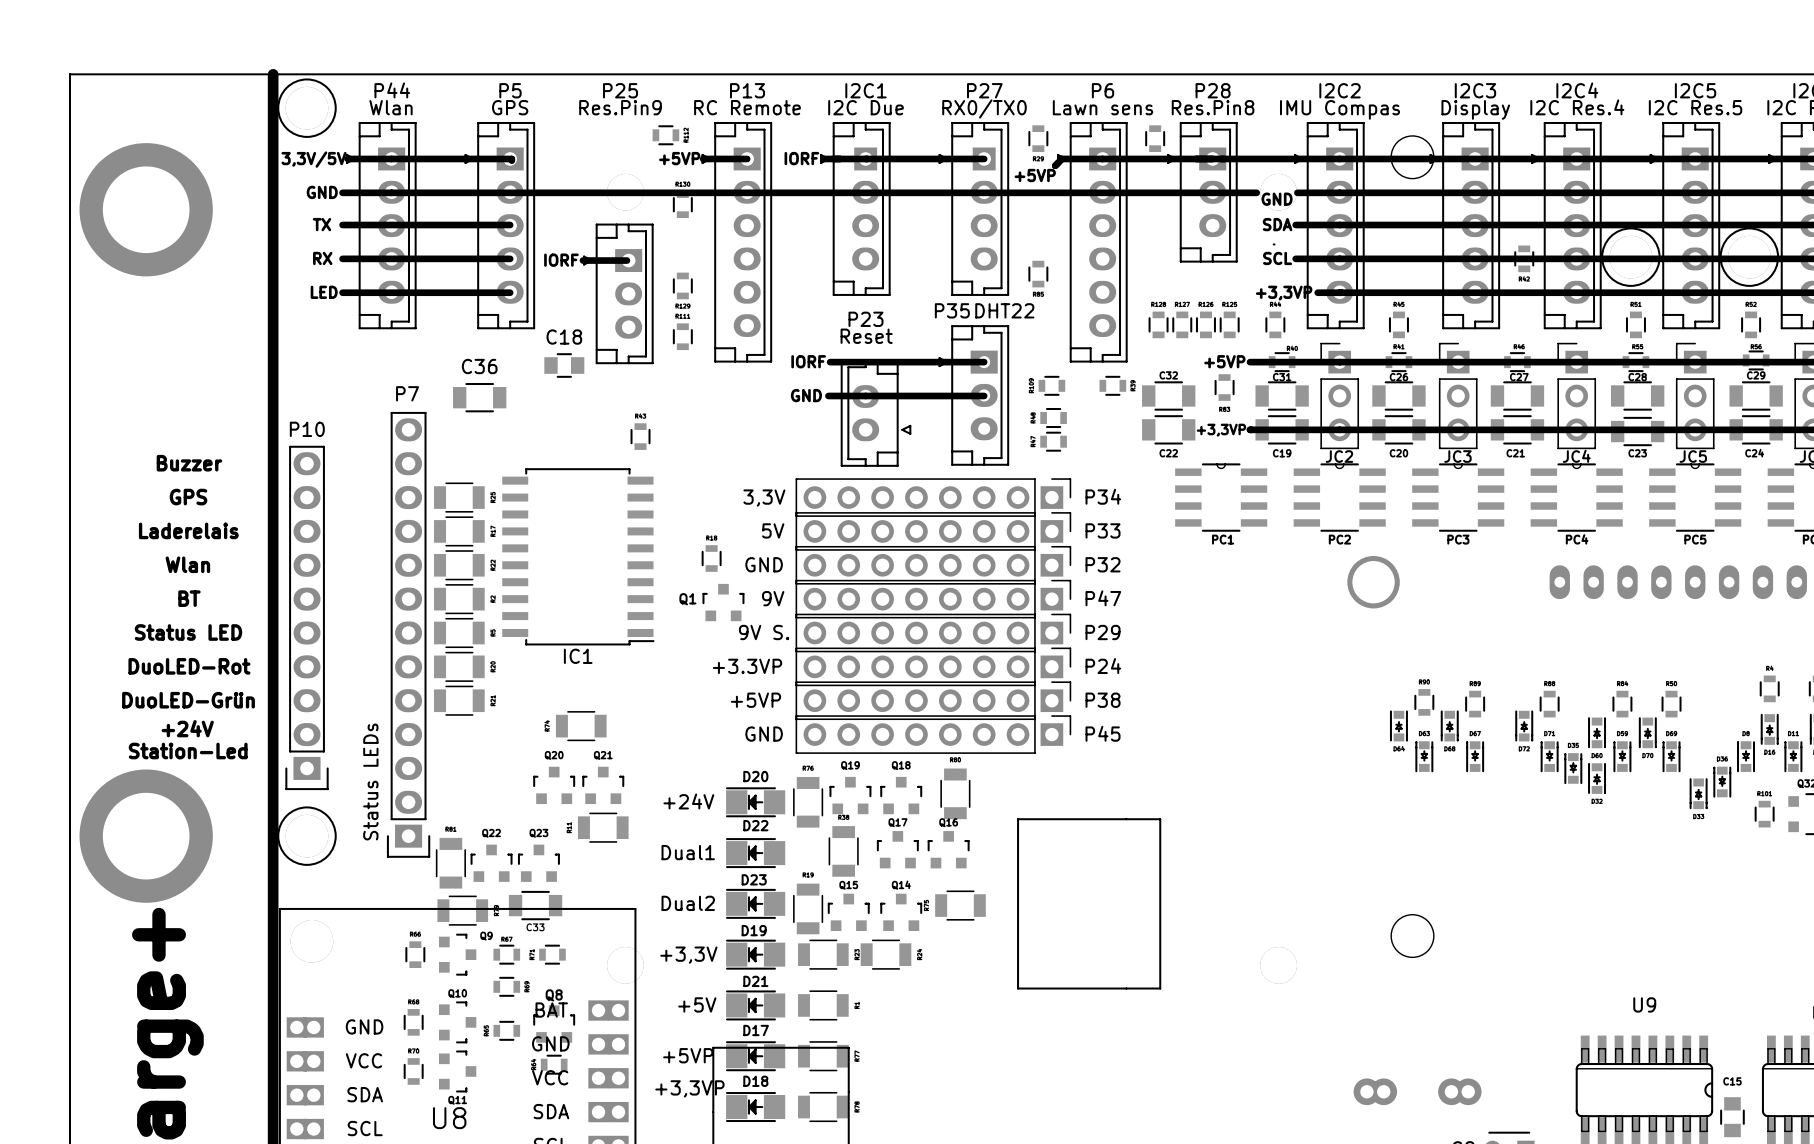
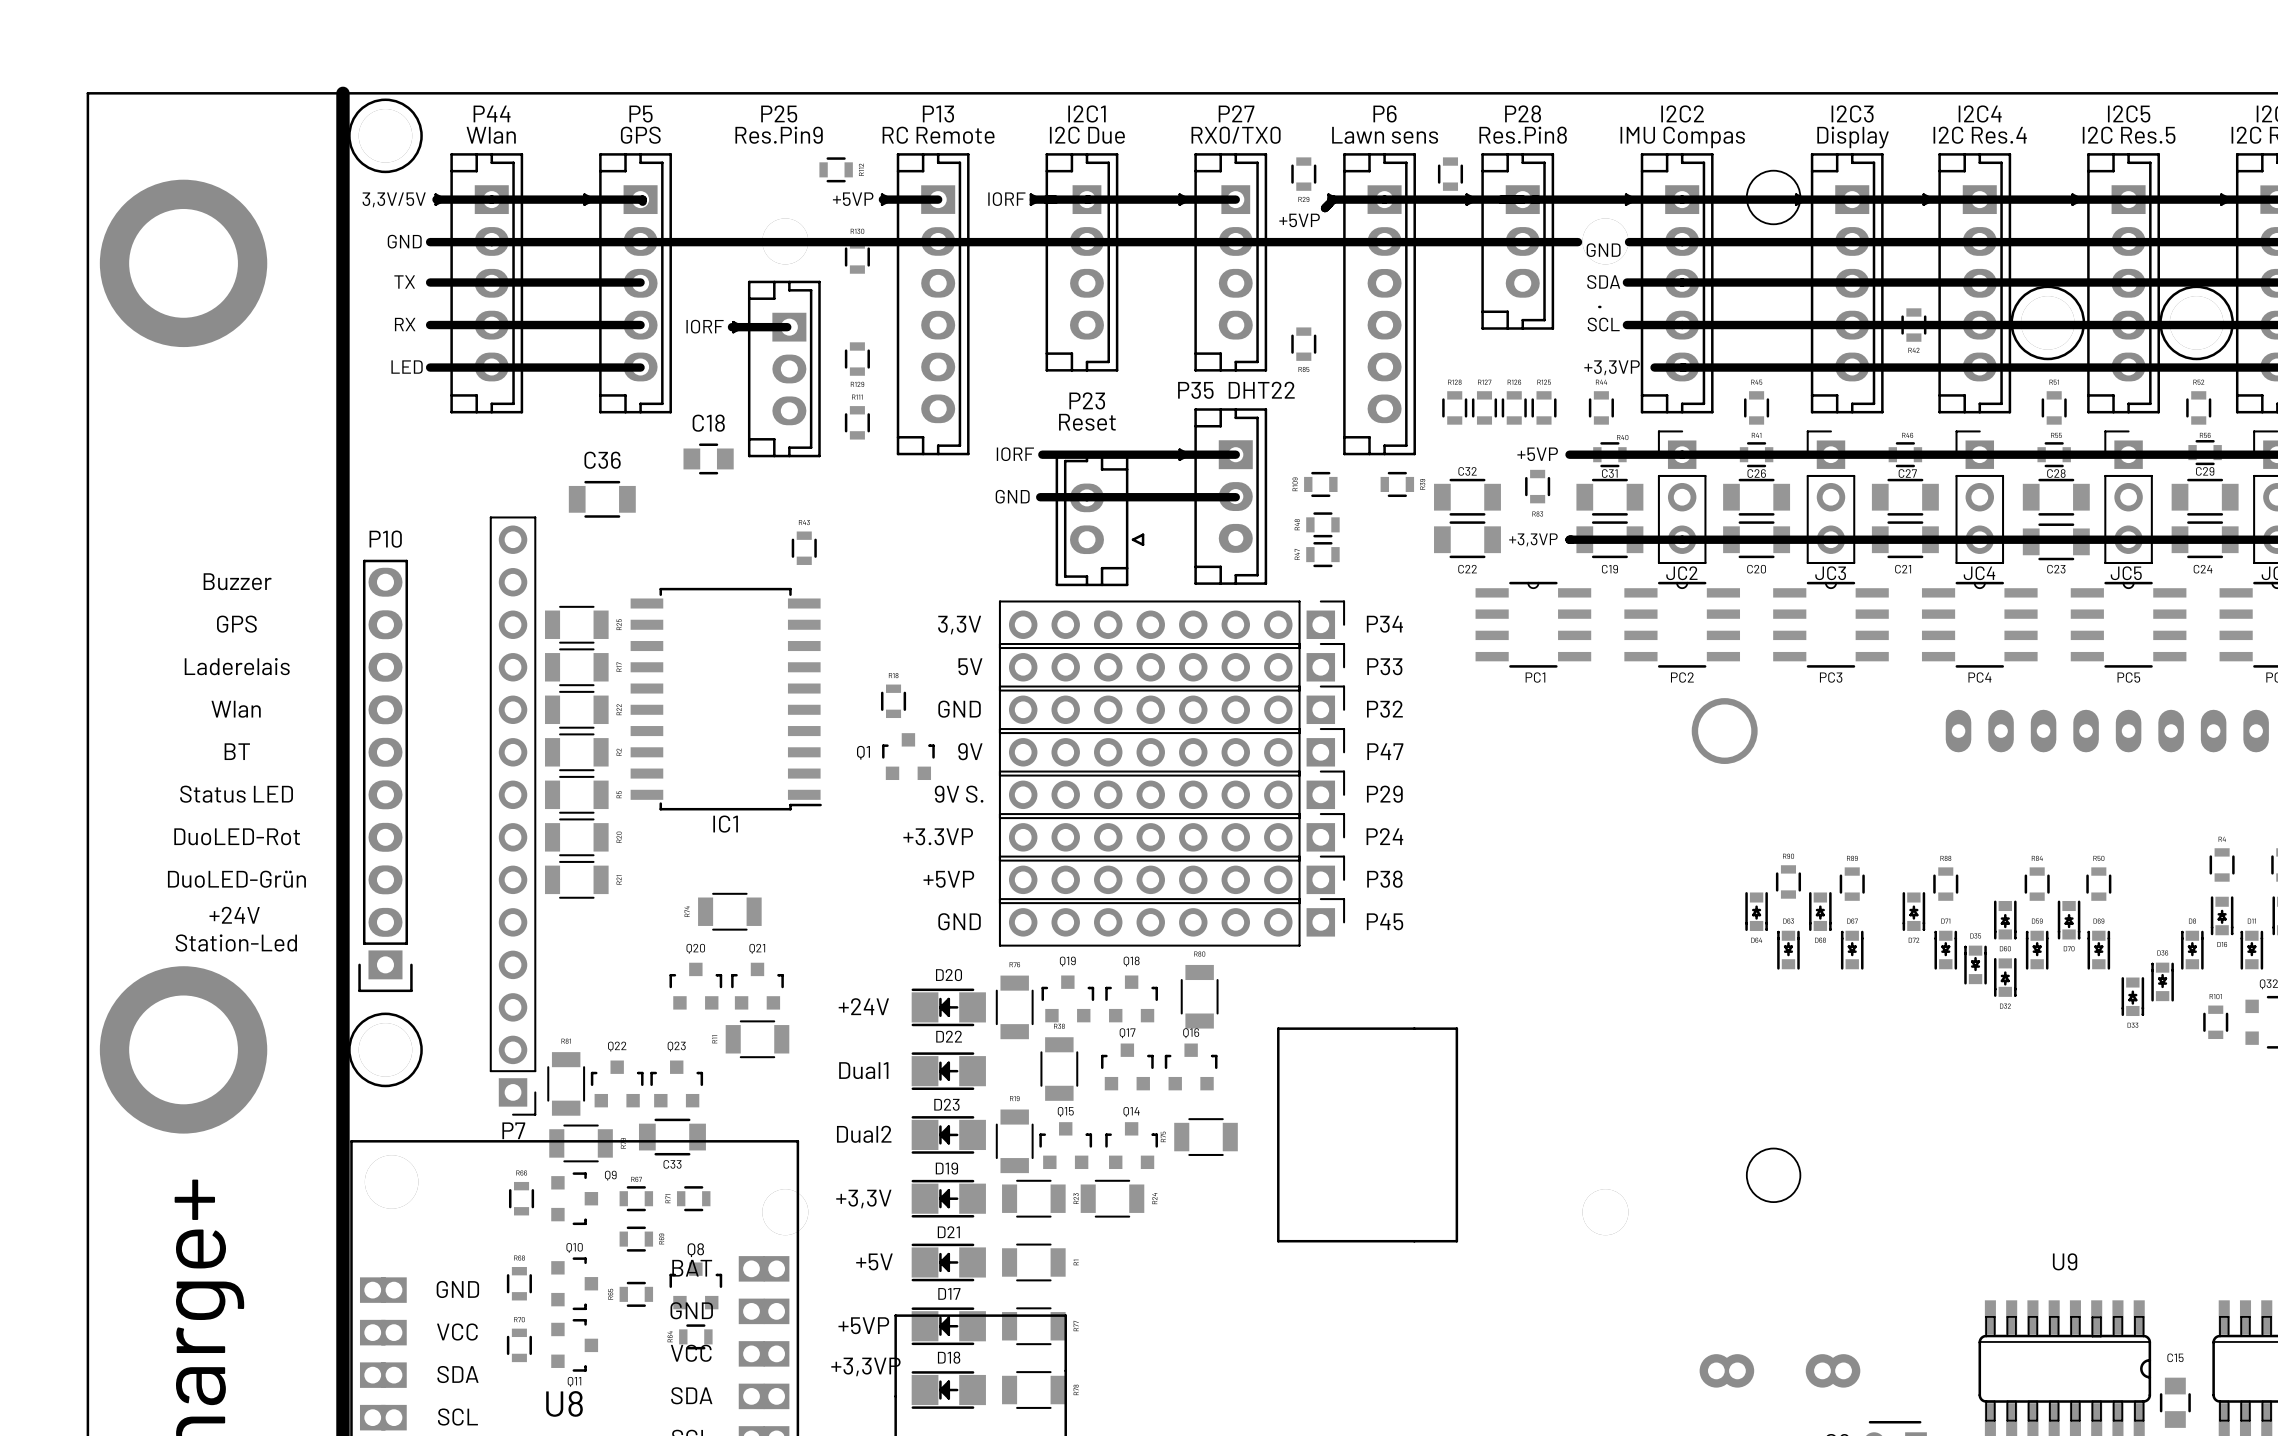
P7 name position: P7 (407, 393) -> P7 (513, 1130)
P7 footprint: [386, 411, 431, 858] -> [489, 516, 537, 1116]
P7 value: Status LEDs (370, 781) -> none

